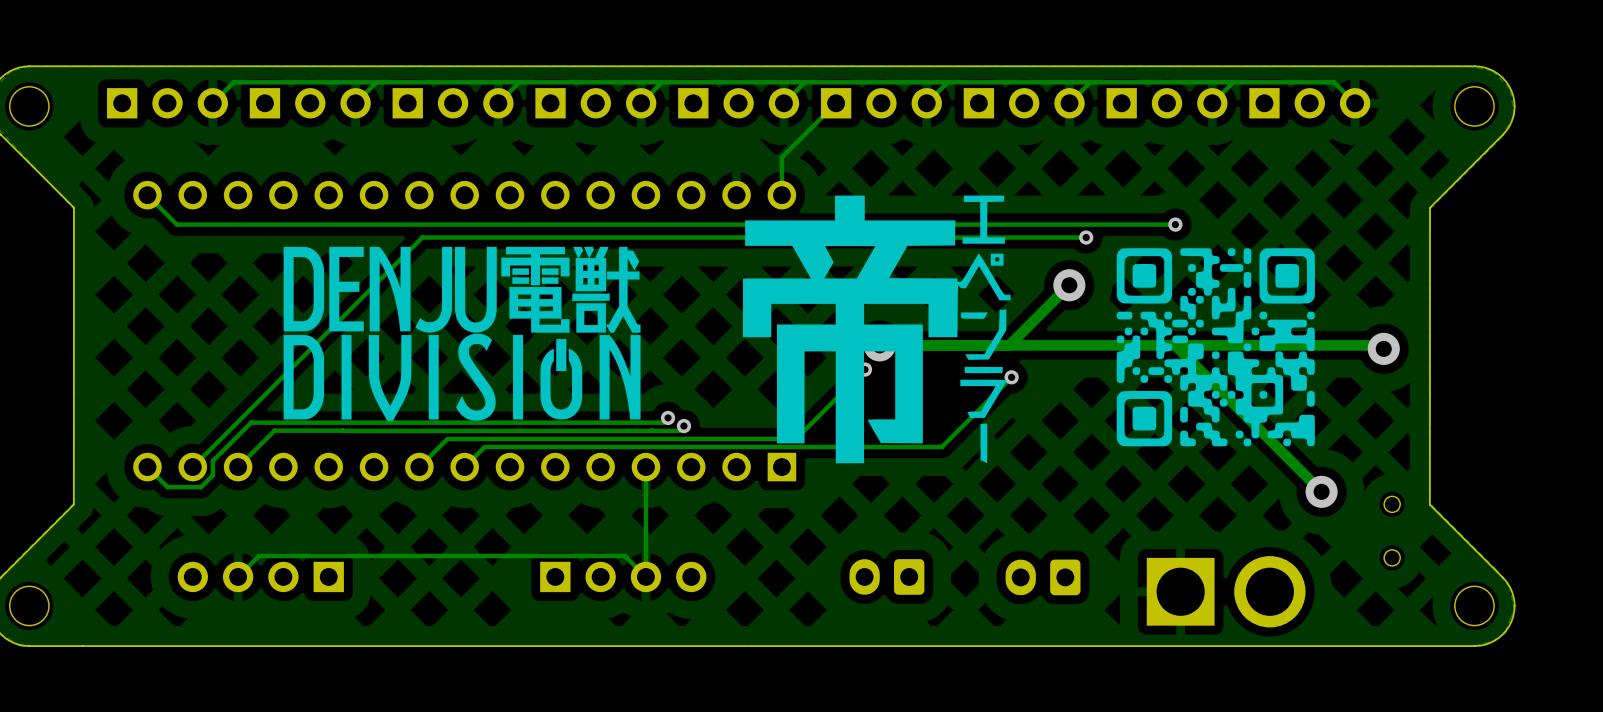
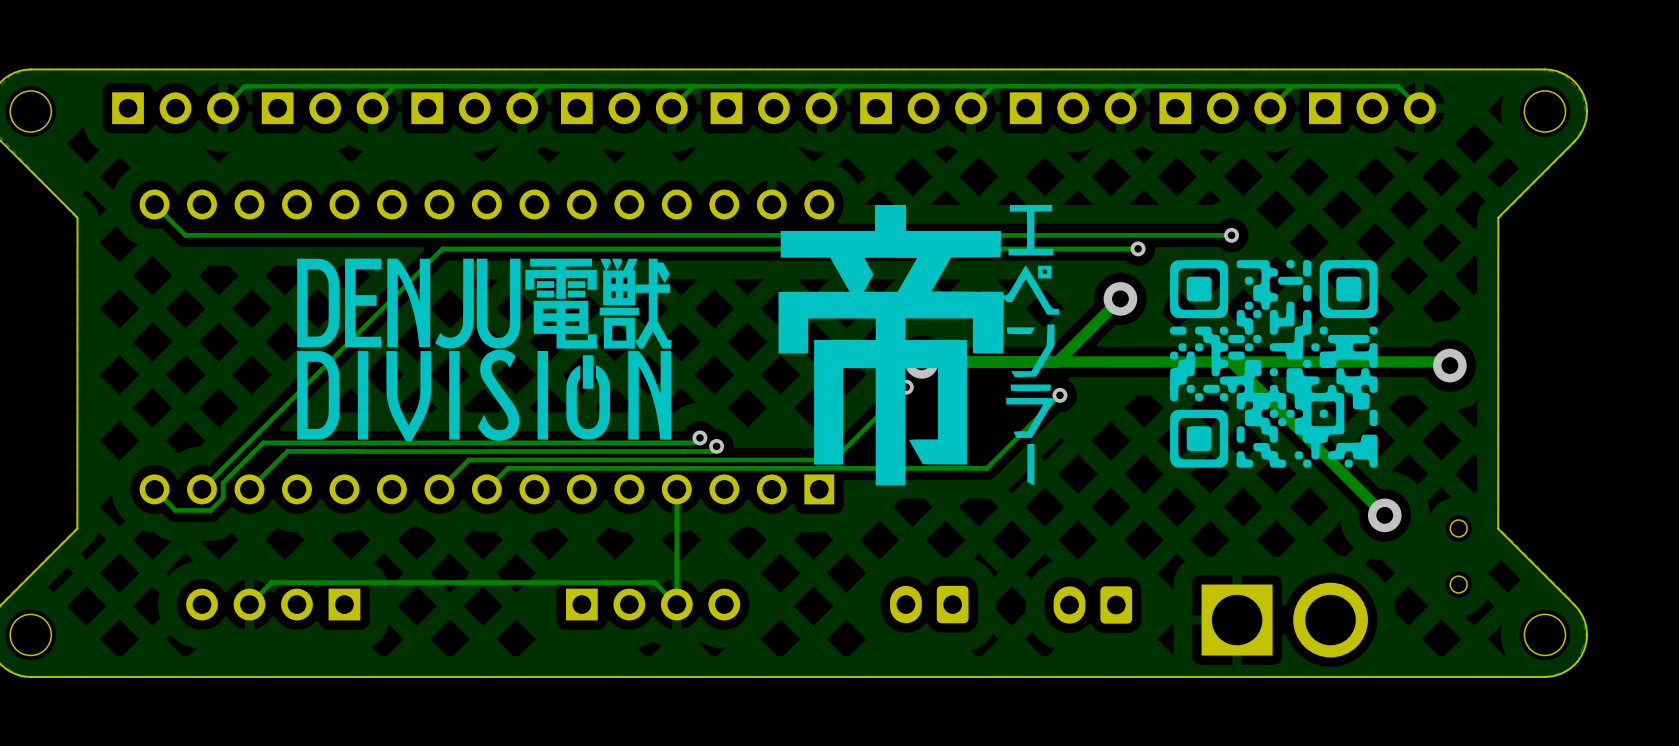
track: (836, 103) (781, 157) (781, 195) -> none

